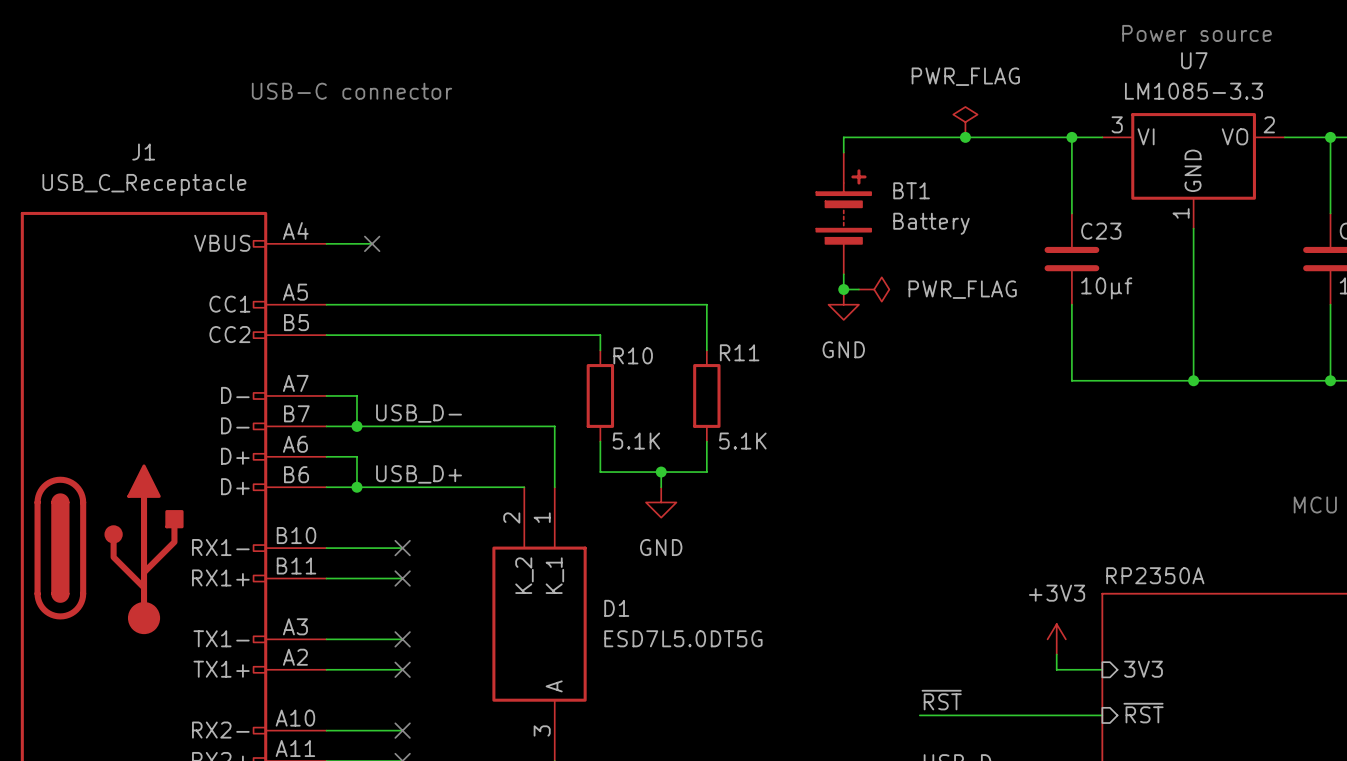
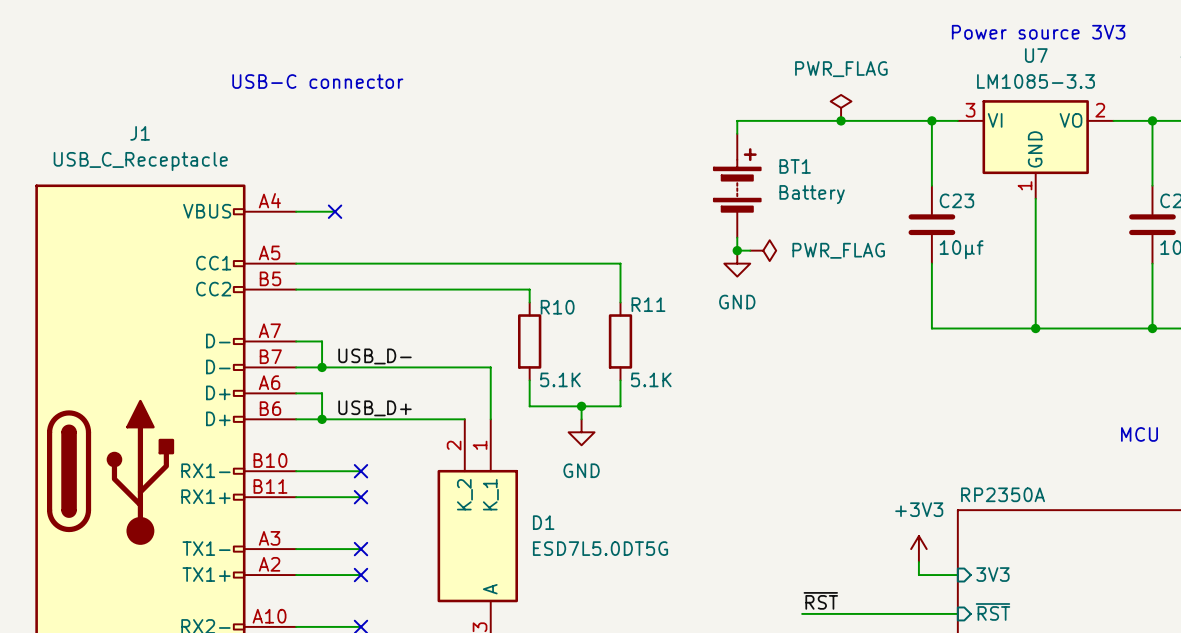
text: Power source (1197, 33) -> Power source 3V3 (1038, 32)

